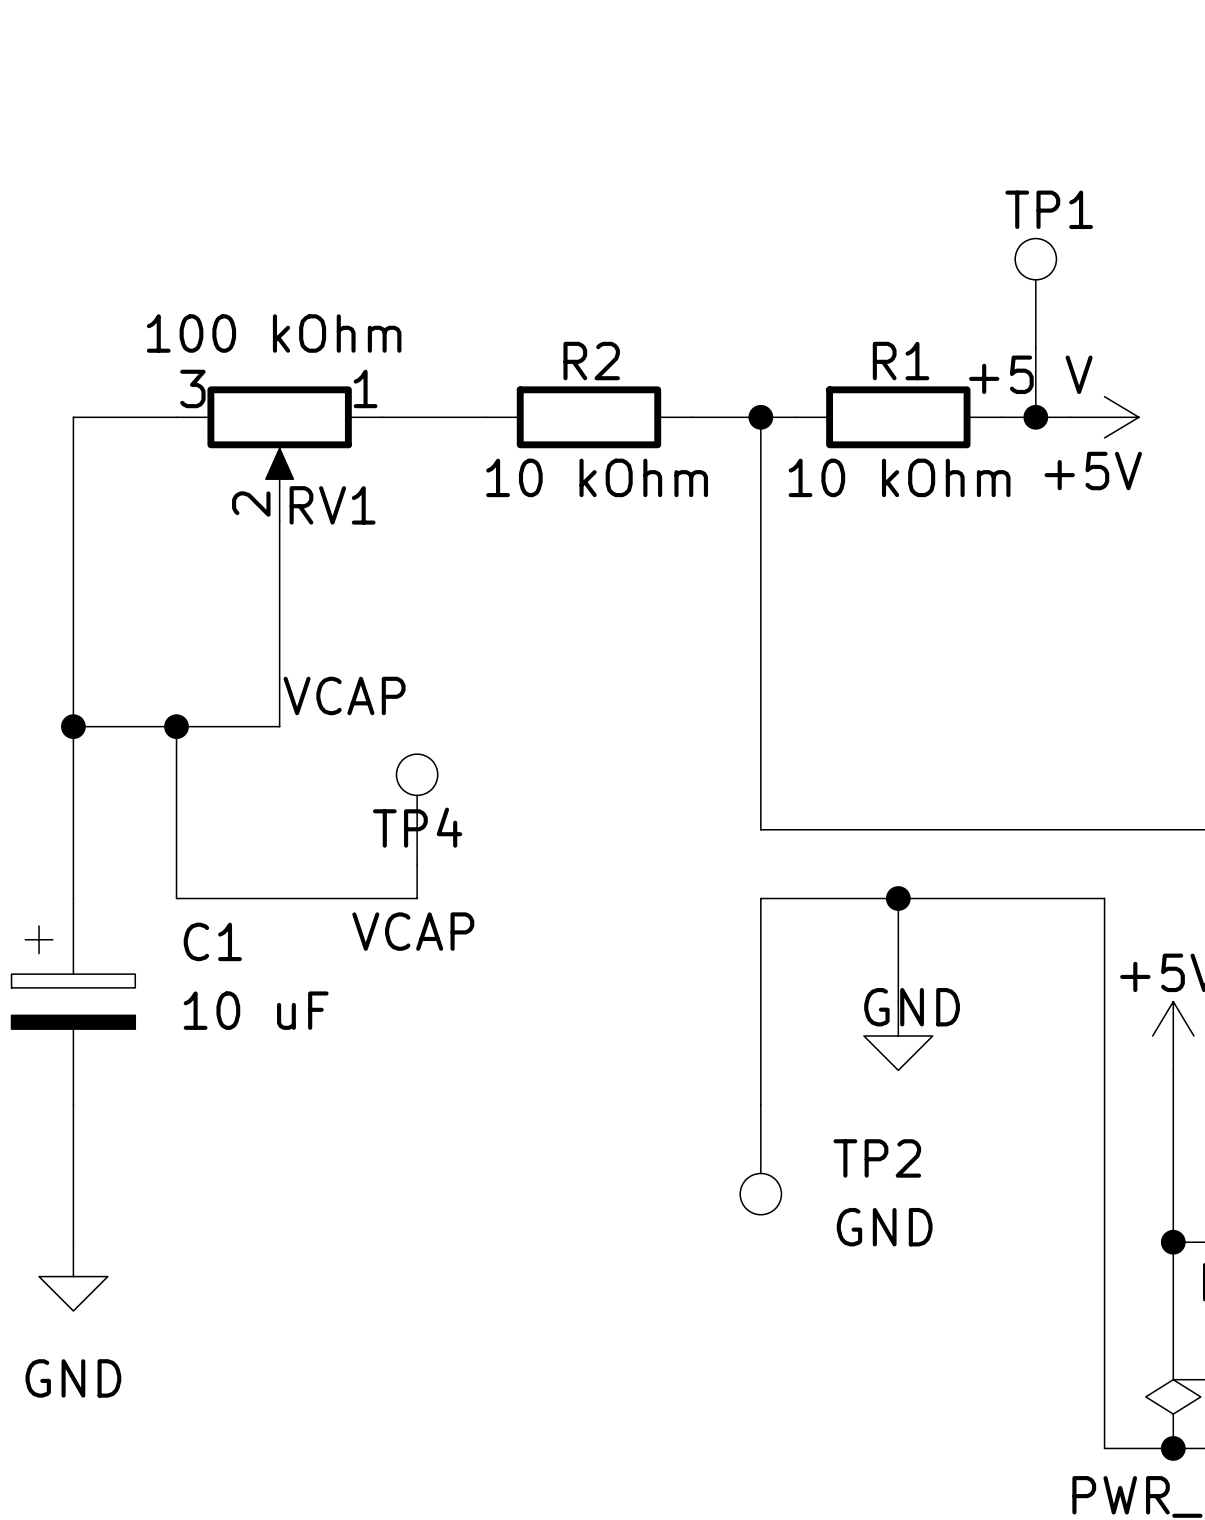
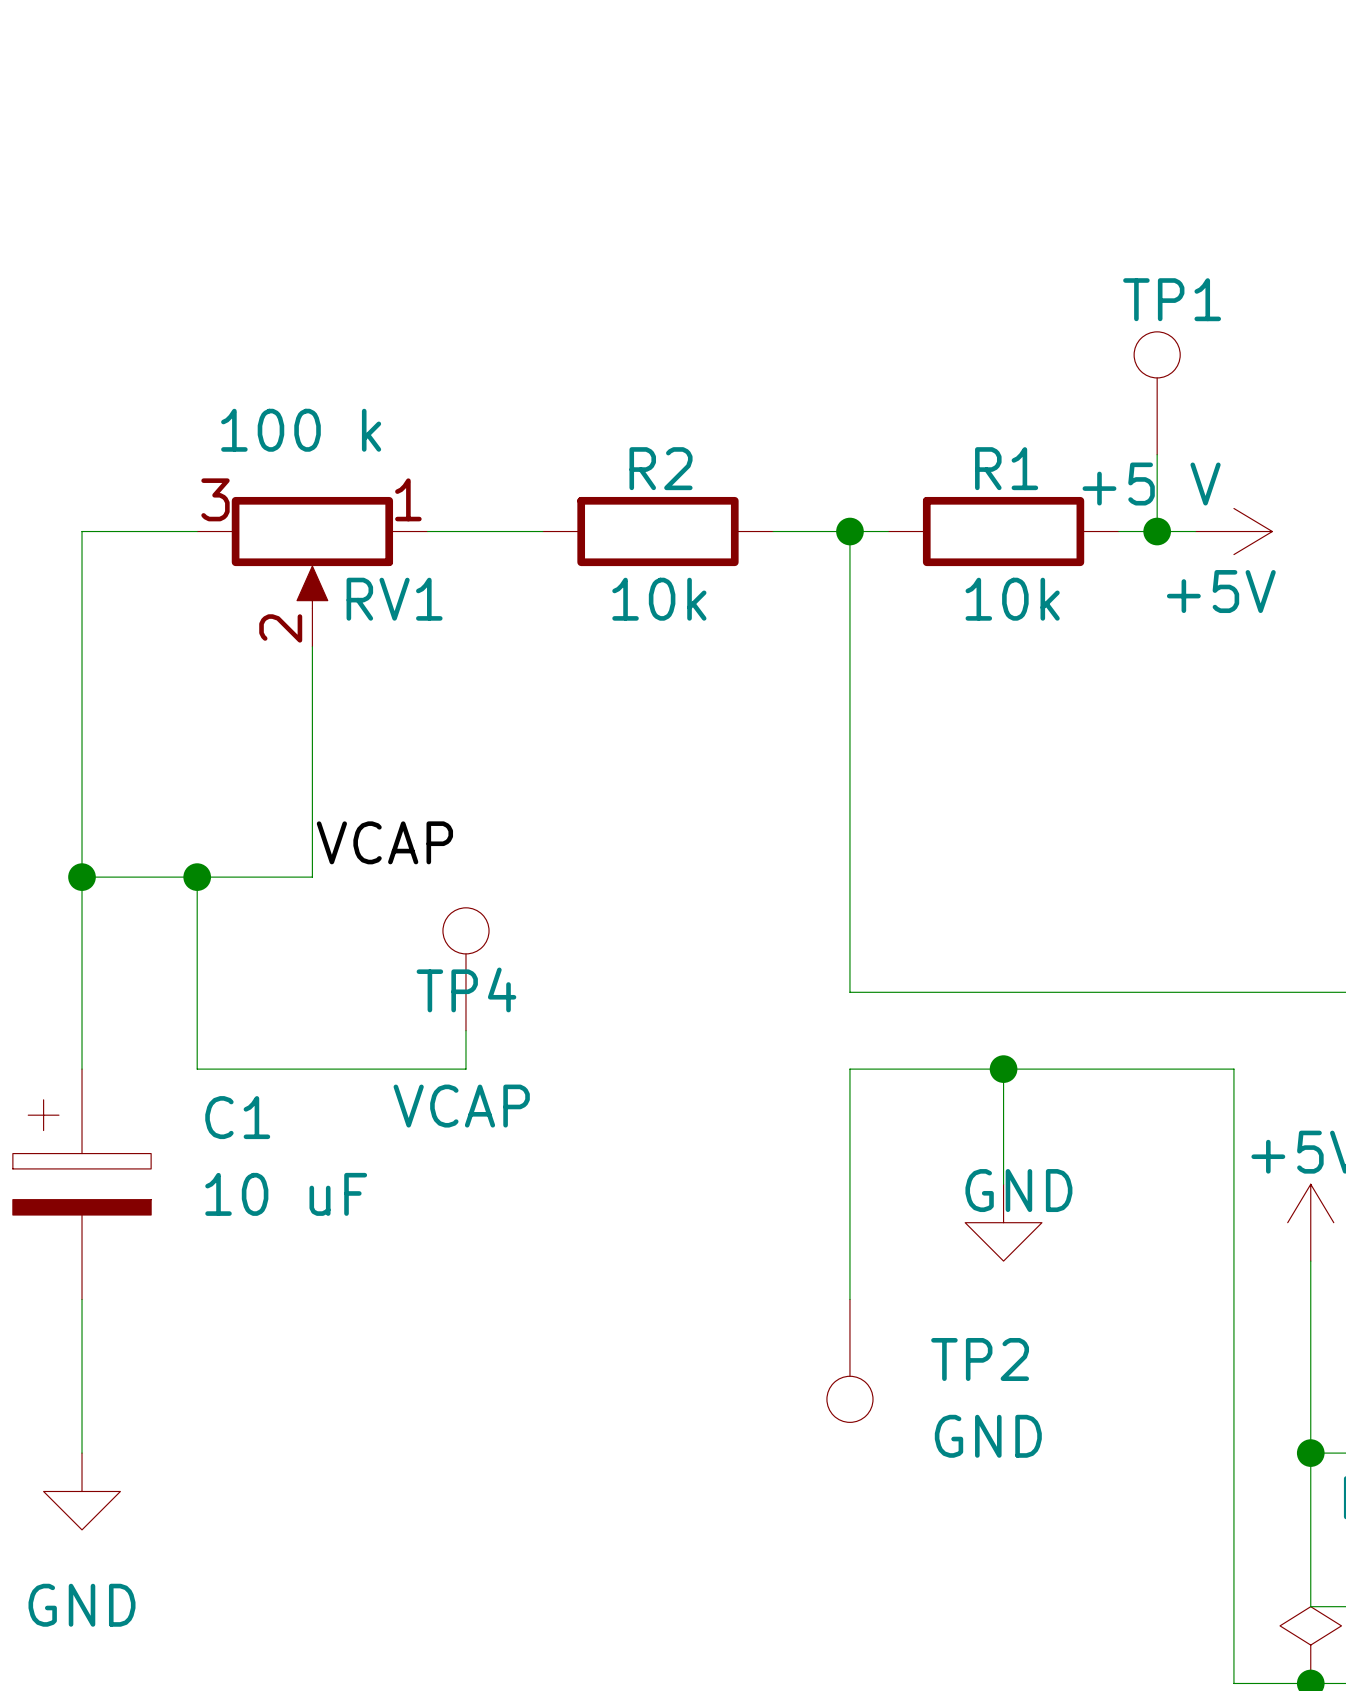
RV1 value: 100 kOhm (274, 333) -> 100 k (301, 430)
R2 value: 10 kOhm (597, 477) -> 10k (659, 599)
R1 value: 10 kOhm (899, 477) -> 10k (1012, 599)
RV1 name position: RV1 (332, 505) -> RV1 (394, 599)

